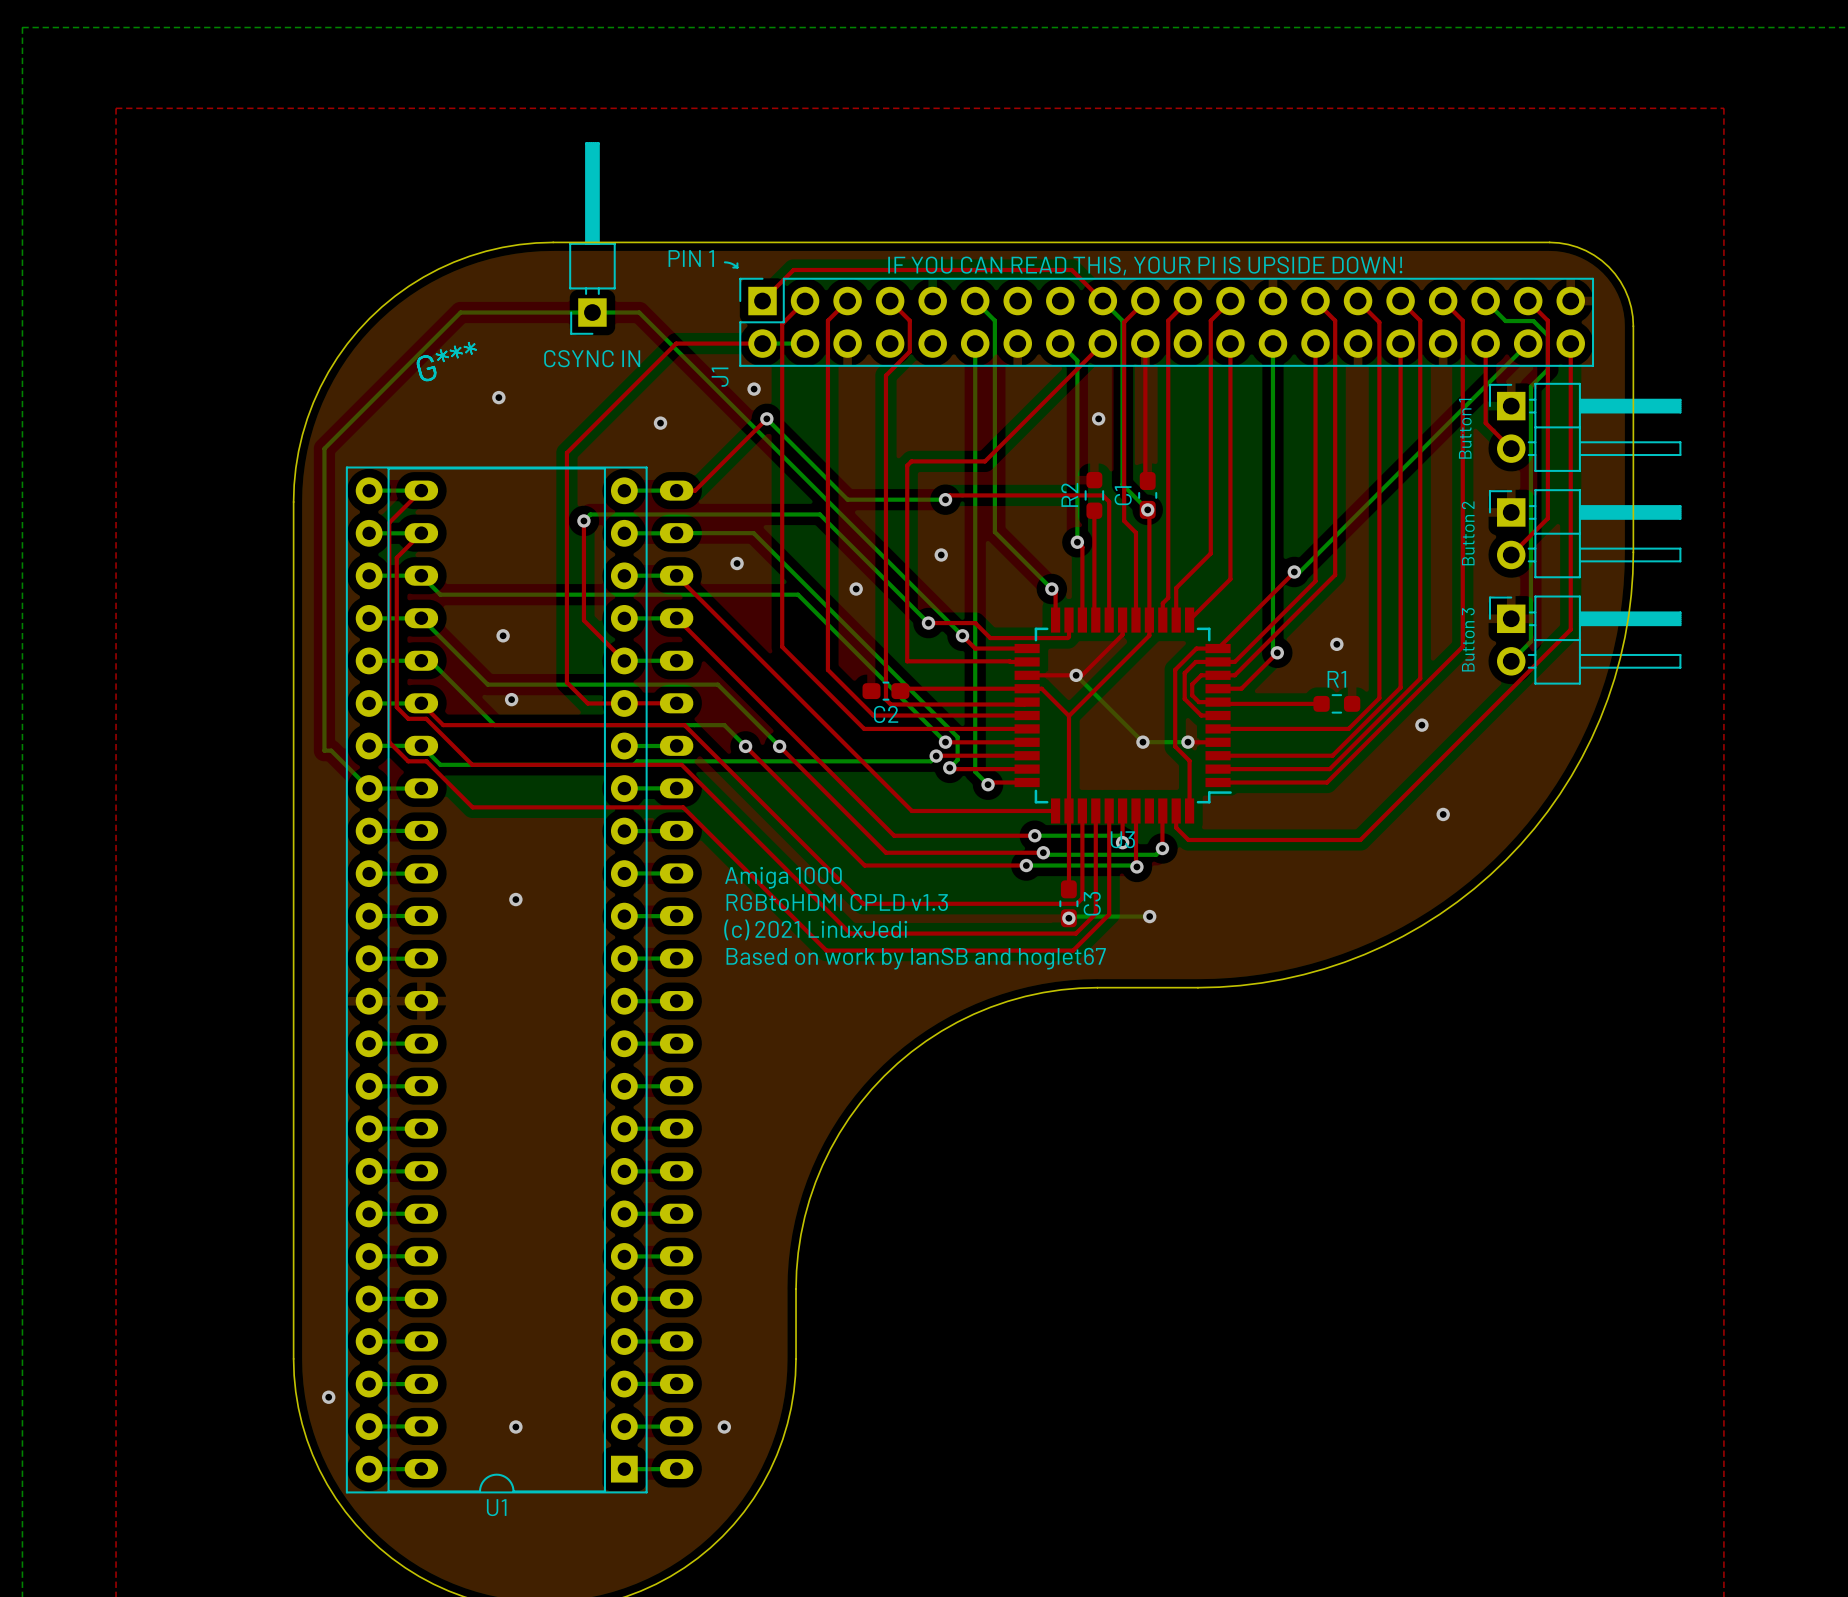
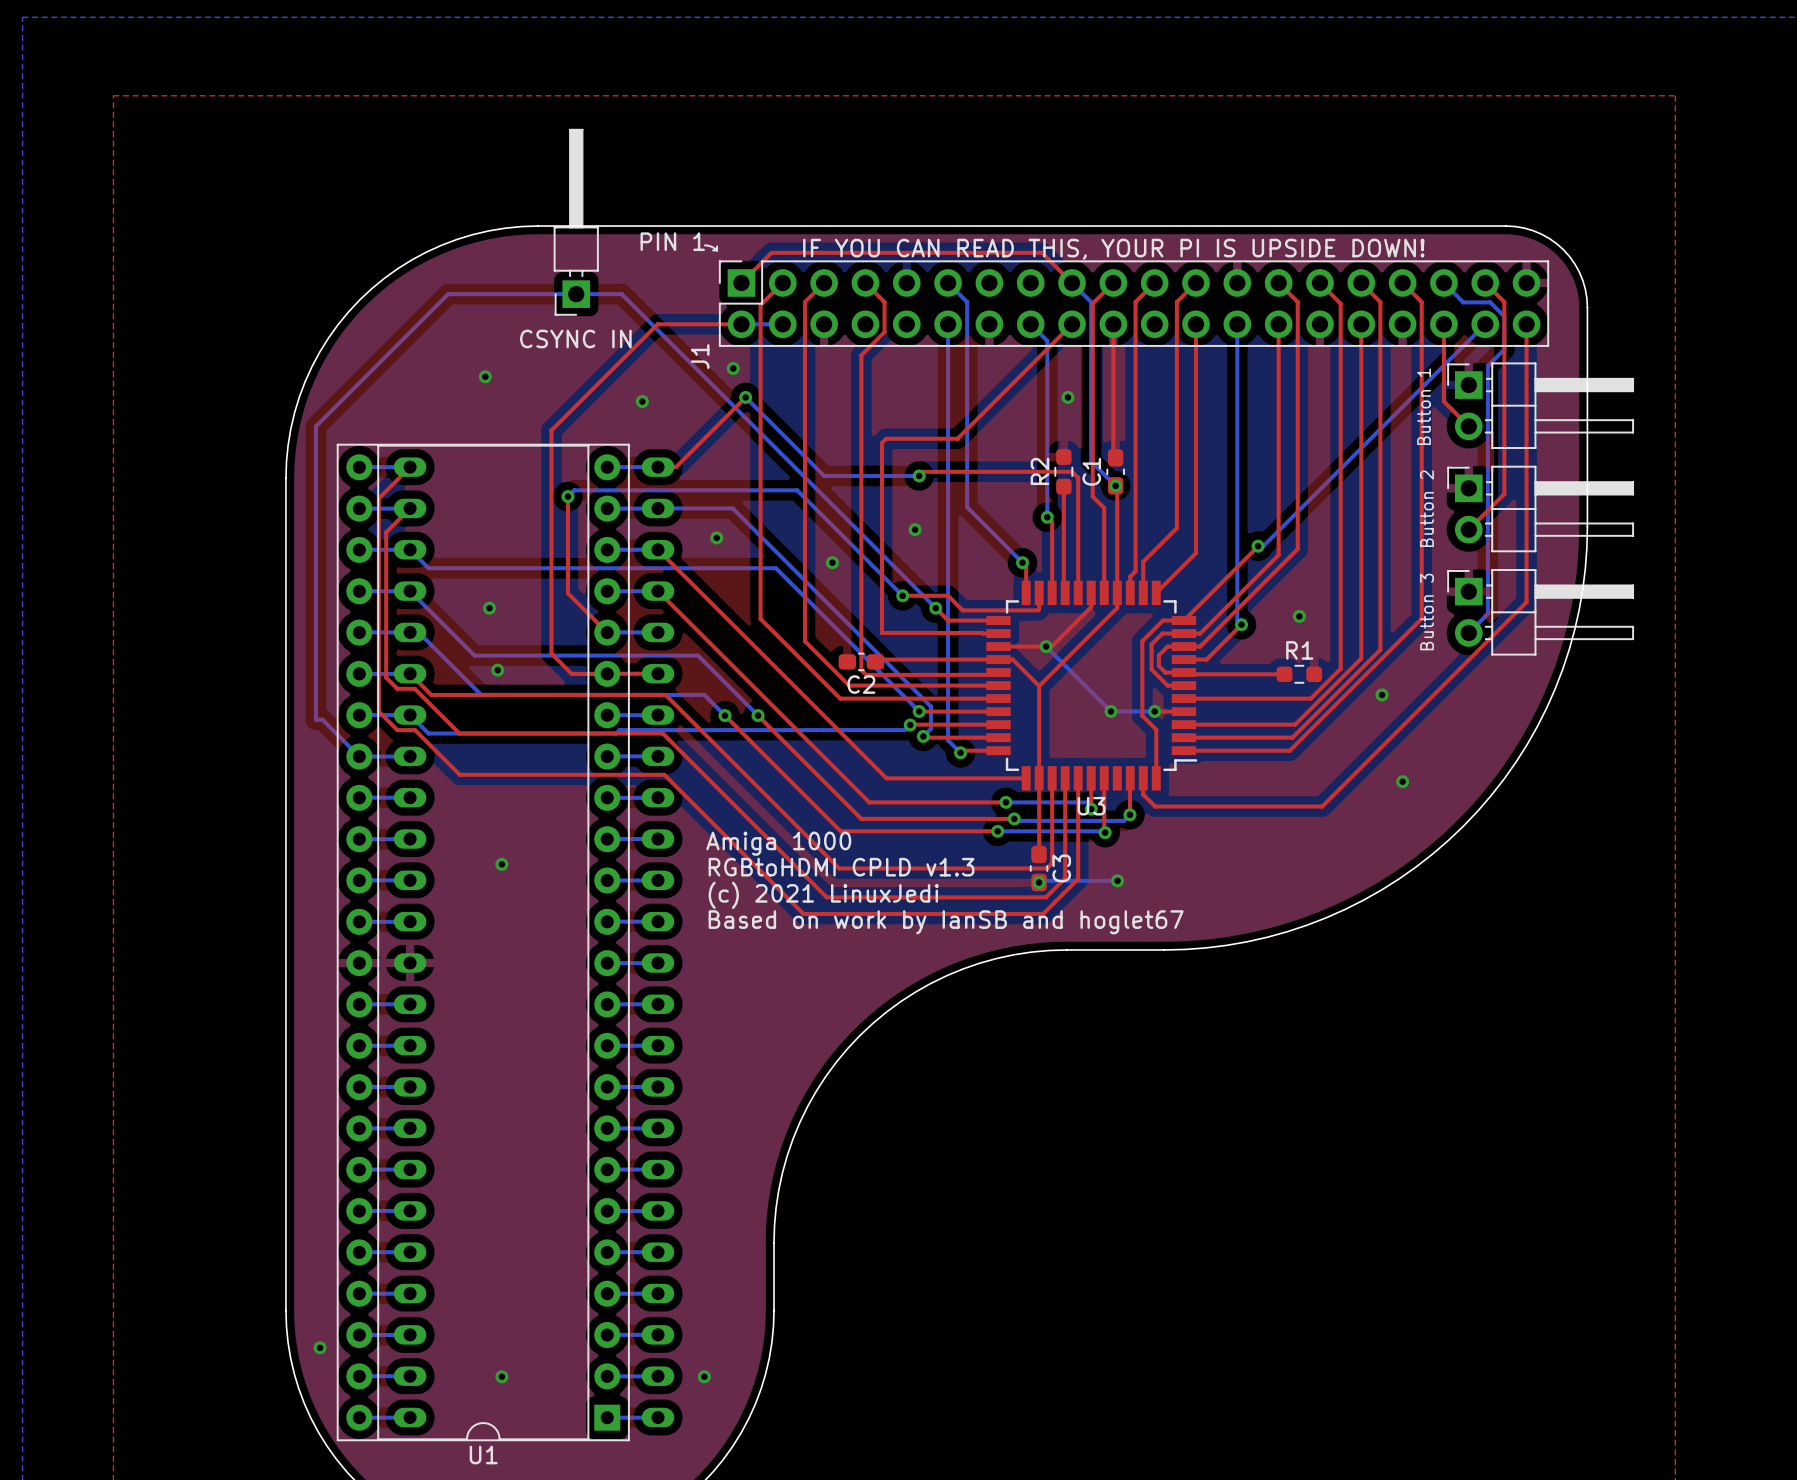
G***: (446, 361) -> none

